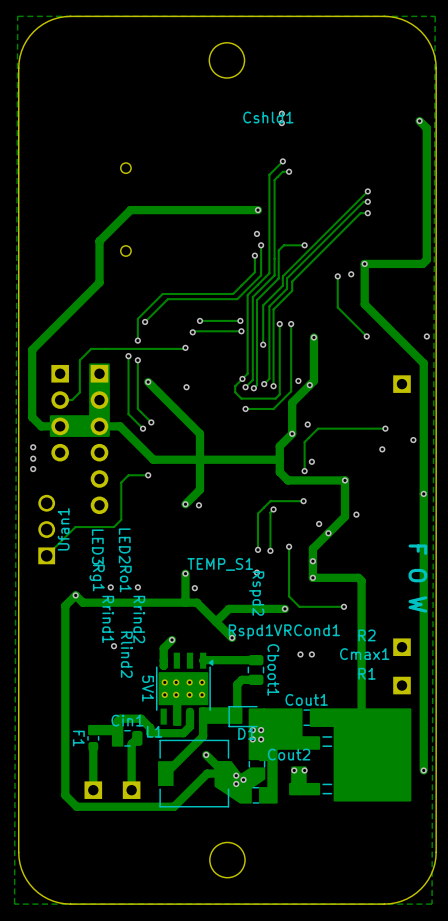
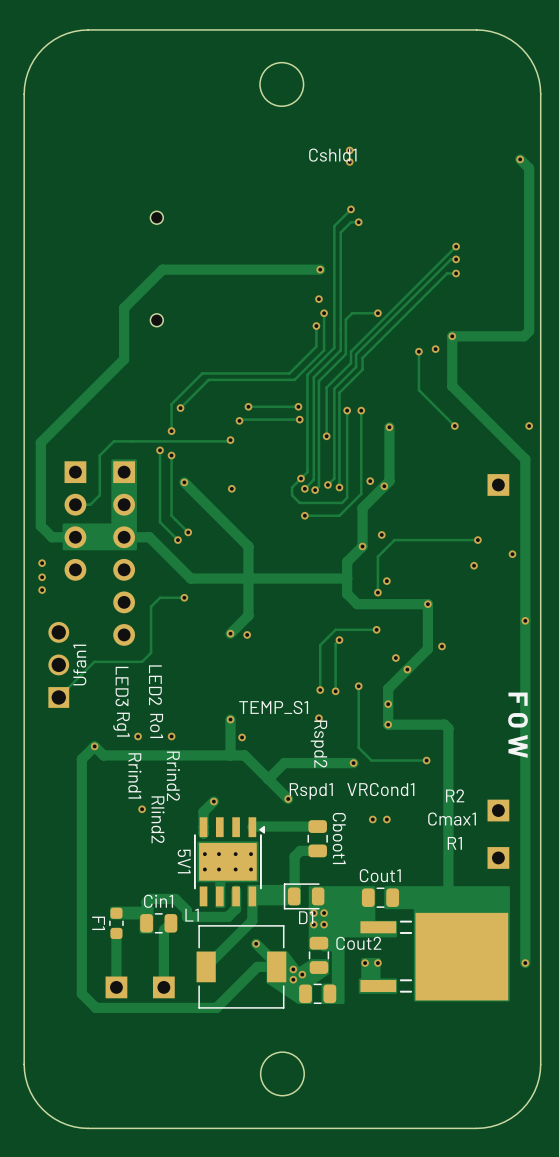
zone outline: (435, 16) (17, 16) (14, 904) (432, 904) (435, 16) -> none

